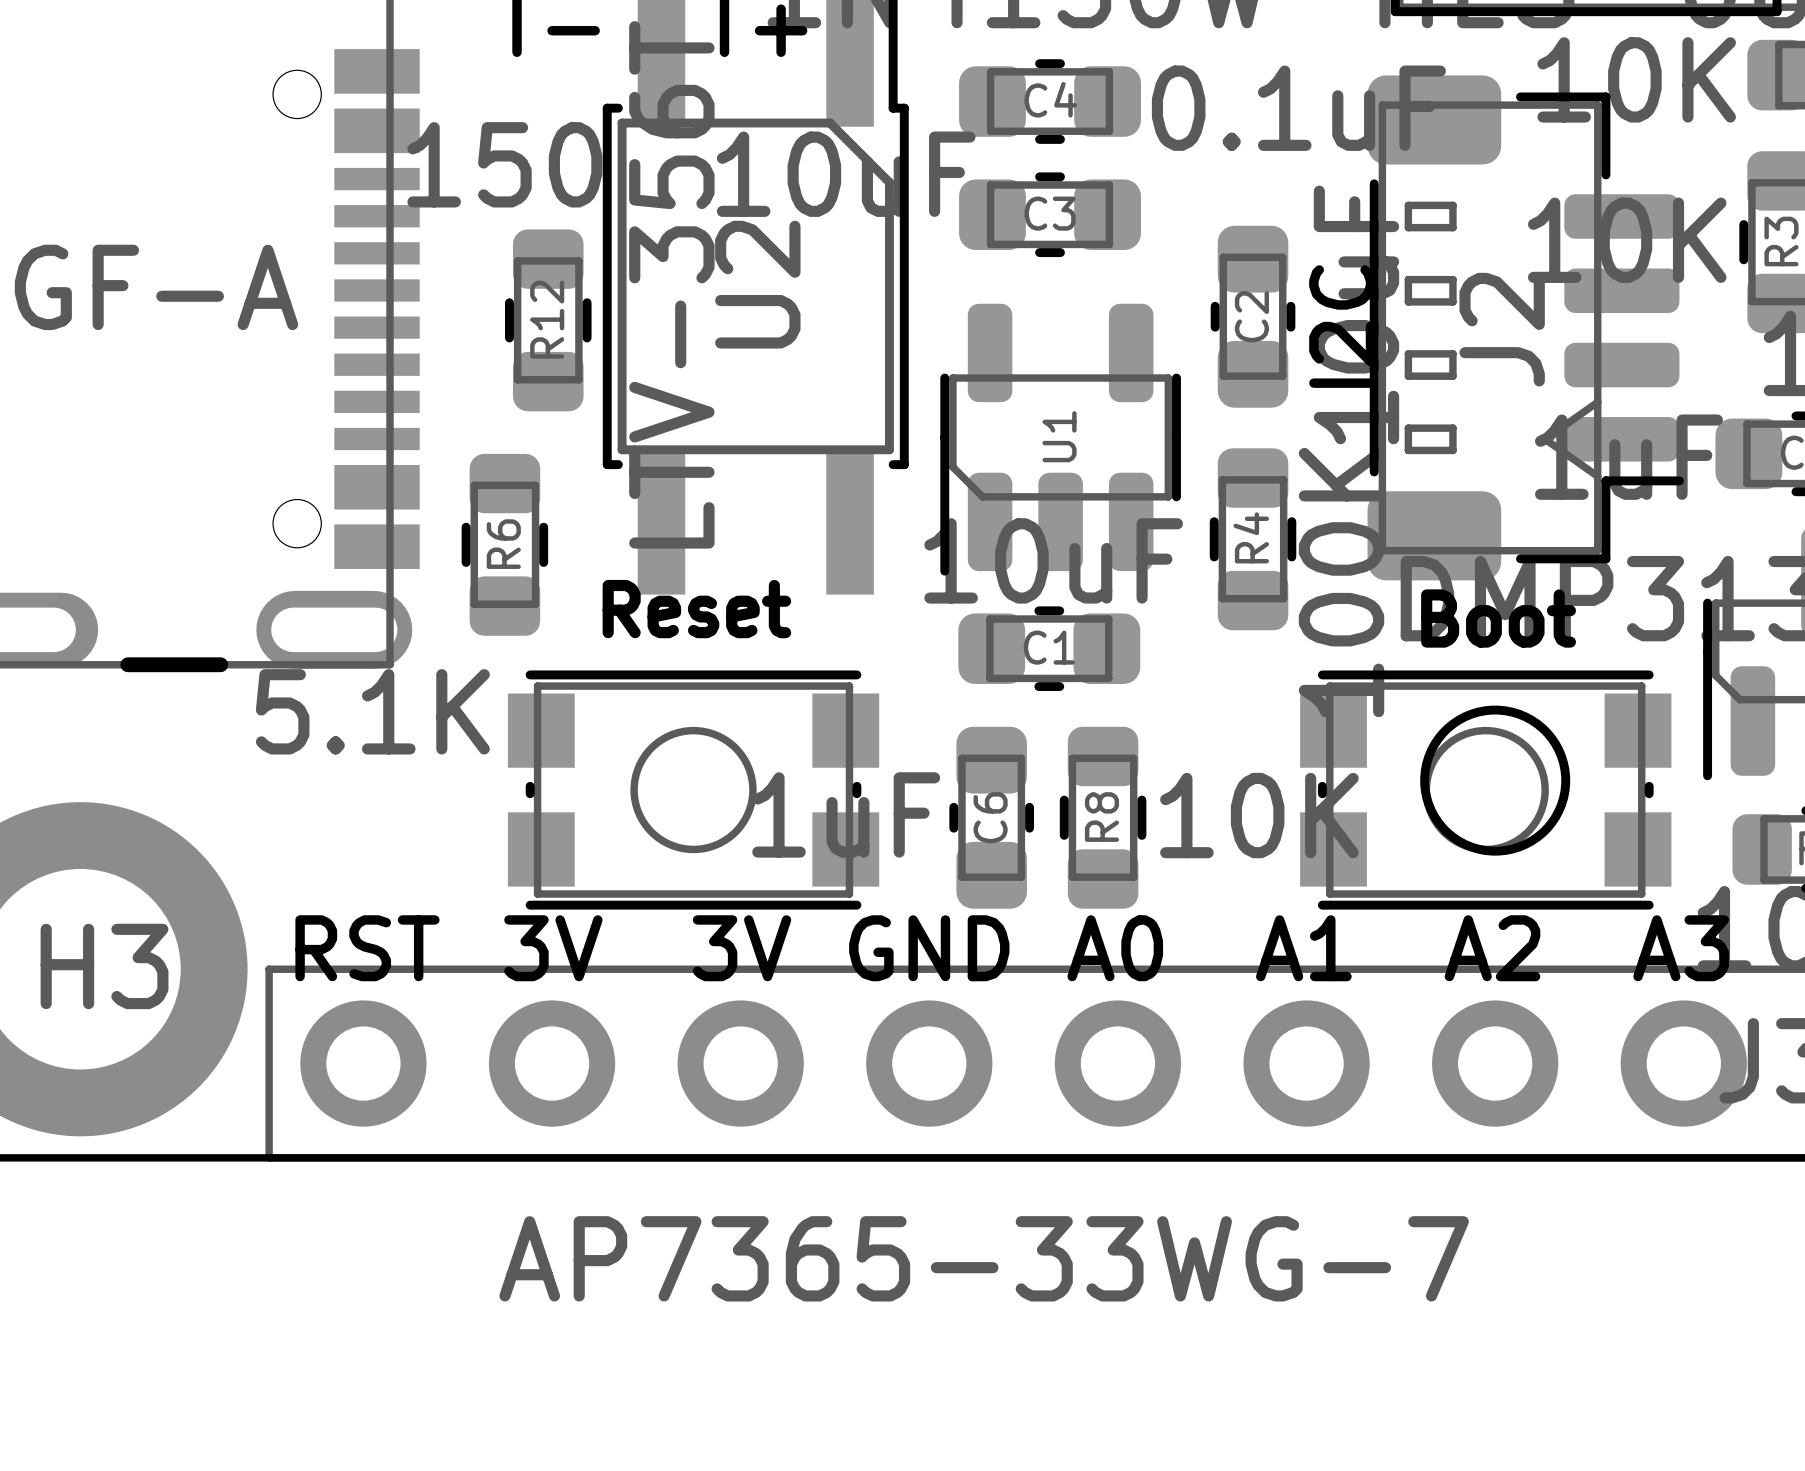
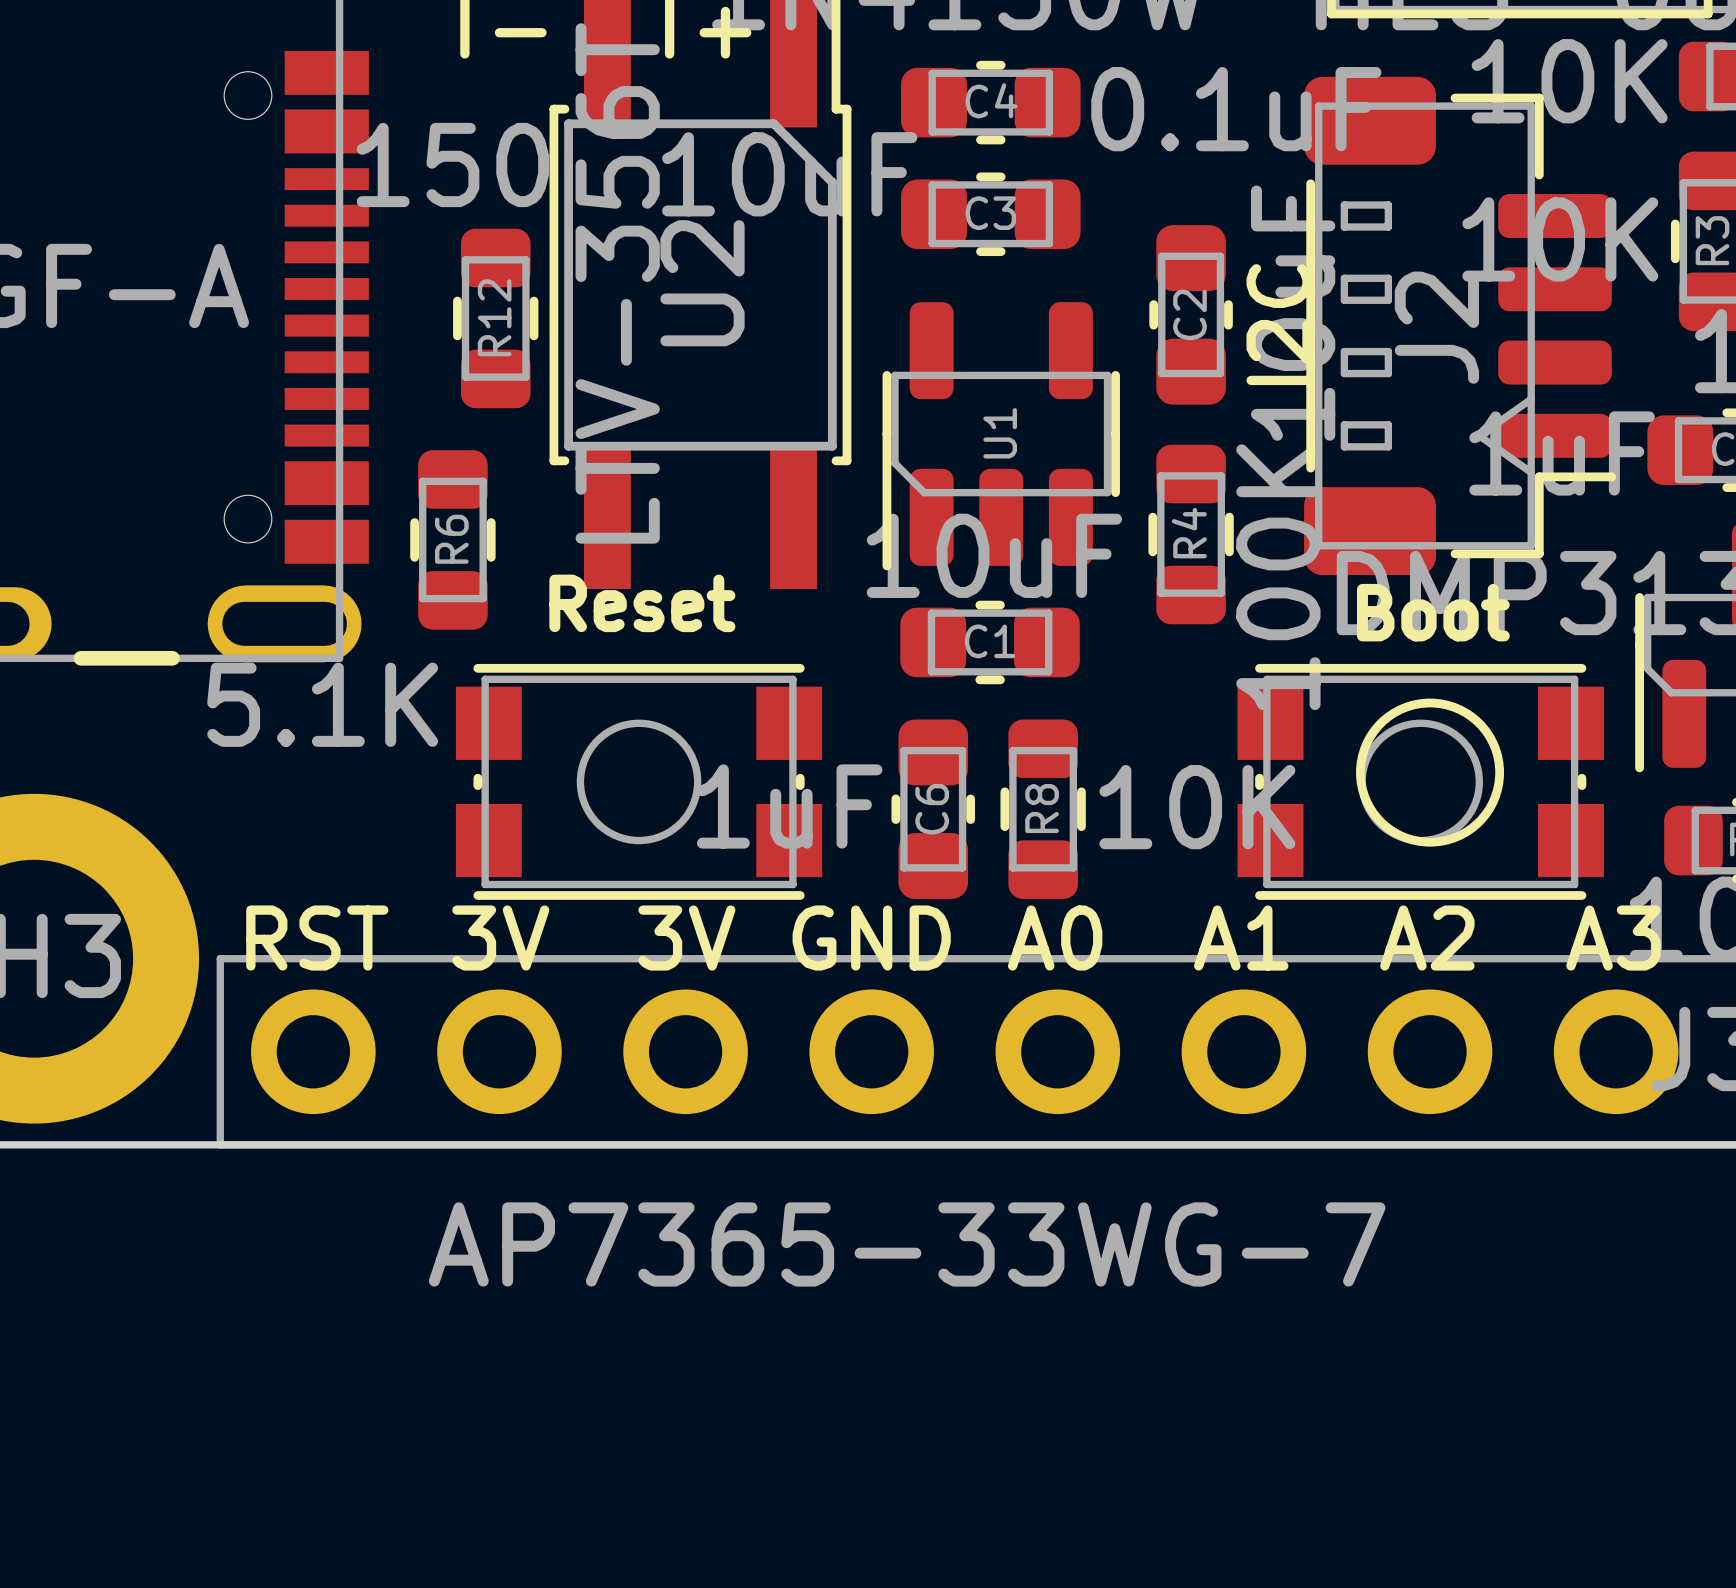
U1 value position: AP7365-33WG-7 (984, 1258) -> AP7365-33WG-7 (907, 1244)

